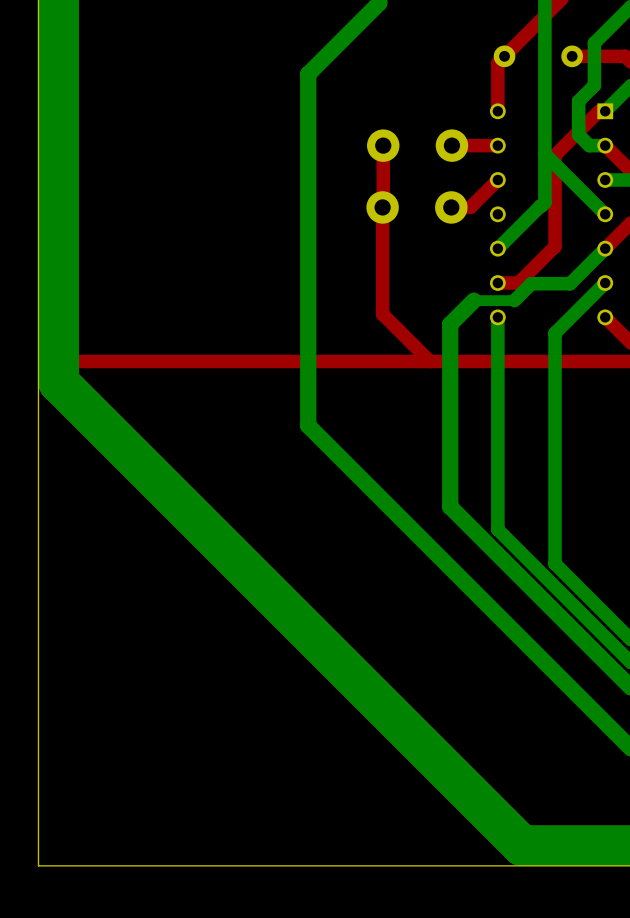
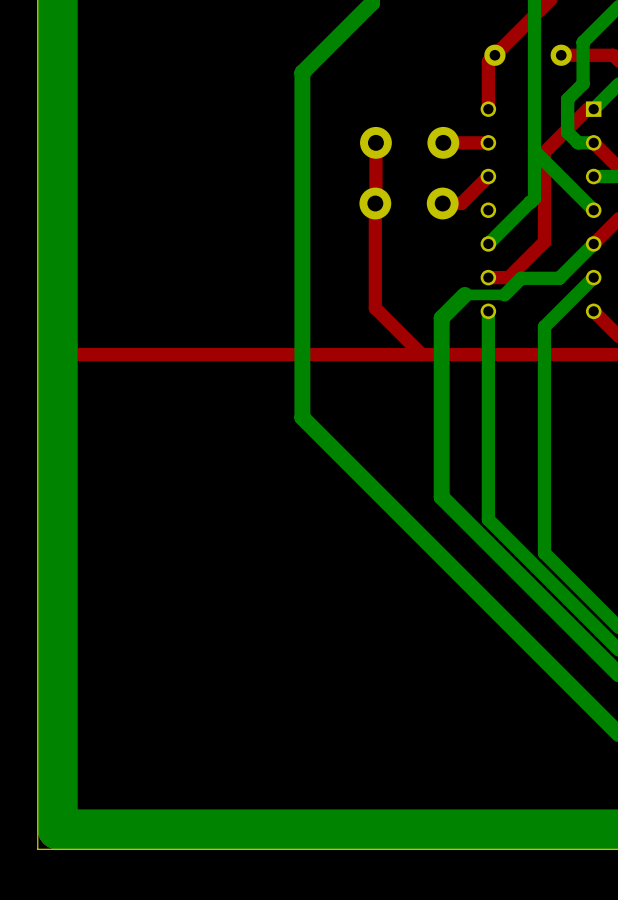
bottom track: (58, 382) (521, 845) -> (57, 375) (57, 829) (511, 829)

